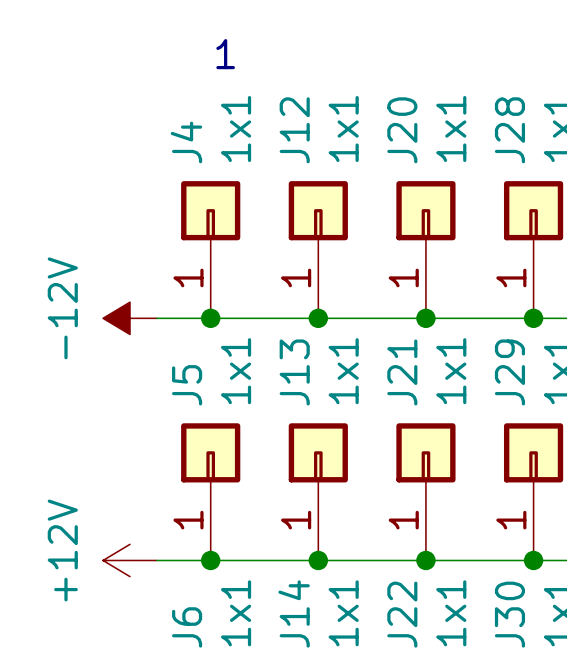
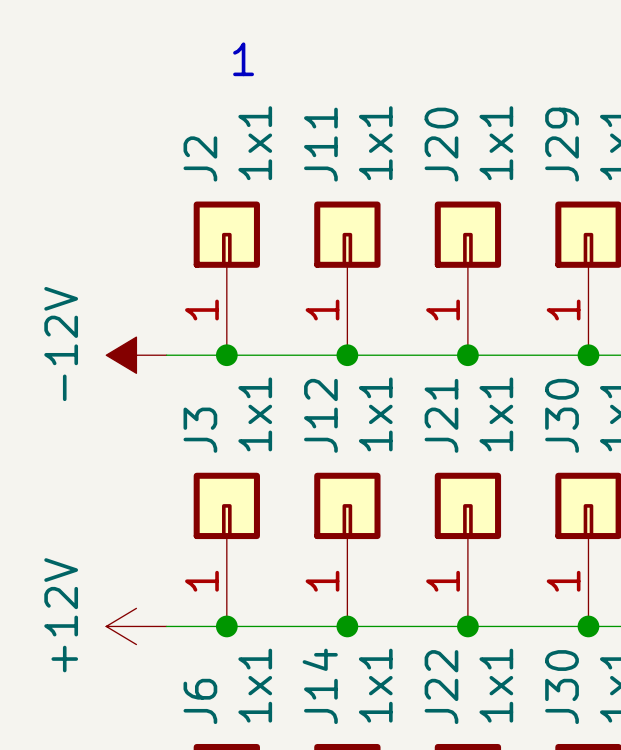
J12 name: J12 (294, 130) -> J11 (320, 144)
J28 name: J28 (509, 130) -> J29 (562, 144)
J4 name: J4 (186, 142) -> J2 (200, 158)
J13 name: J13 (294, 372) -> J12 (320, 415)
J29 name: J29 (509, 372) -> J30 (562, 415)
J5 name: J5 (187, 385) -> J3 (200, 430)

